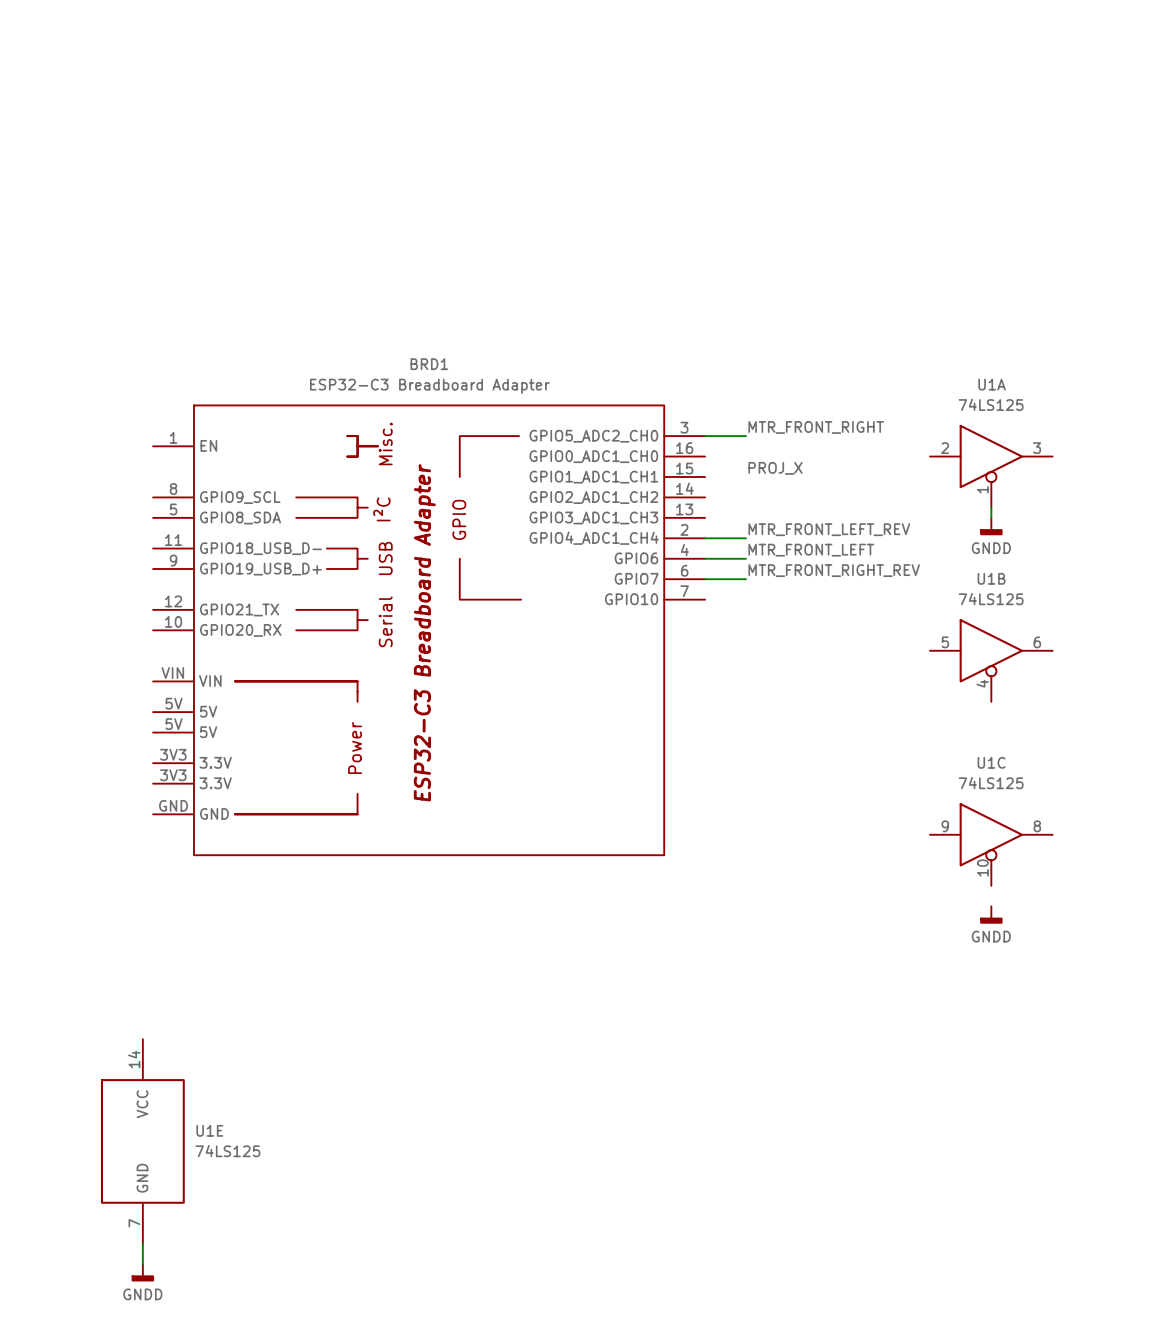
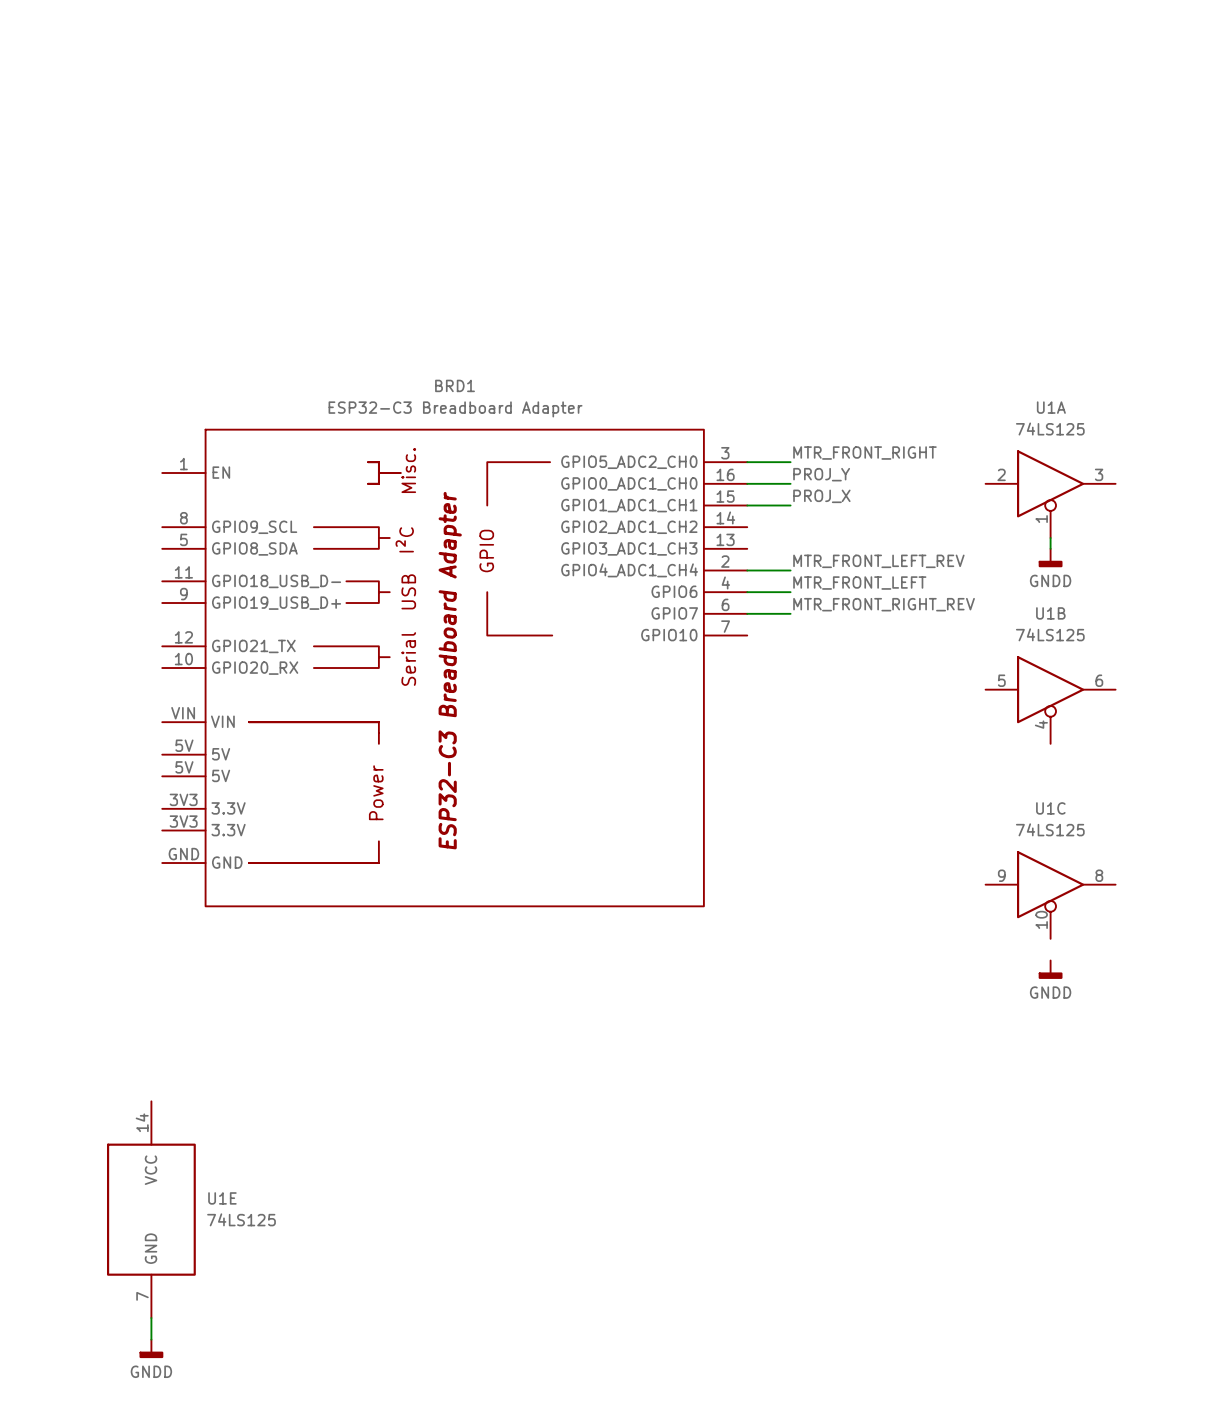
label: none -> PROJ_Y (821, 474)
wire: none -> (747, 483) (790, 483)
wire: none -> (747, 505) (790, 505)

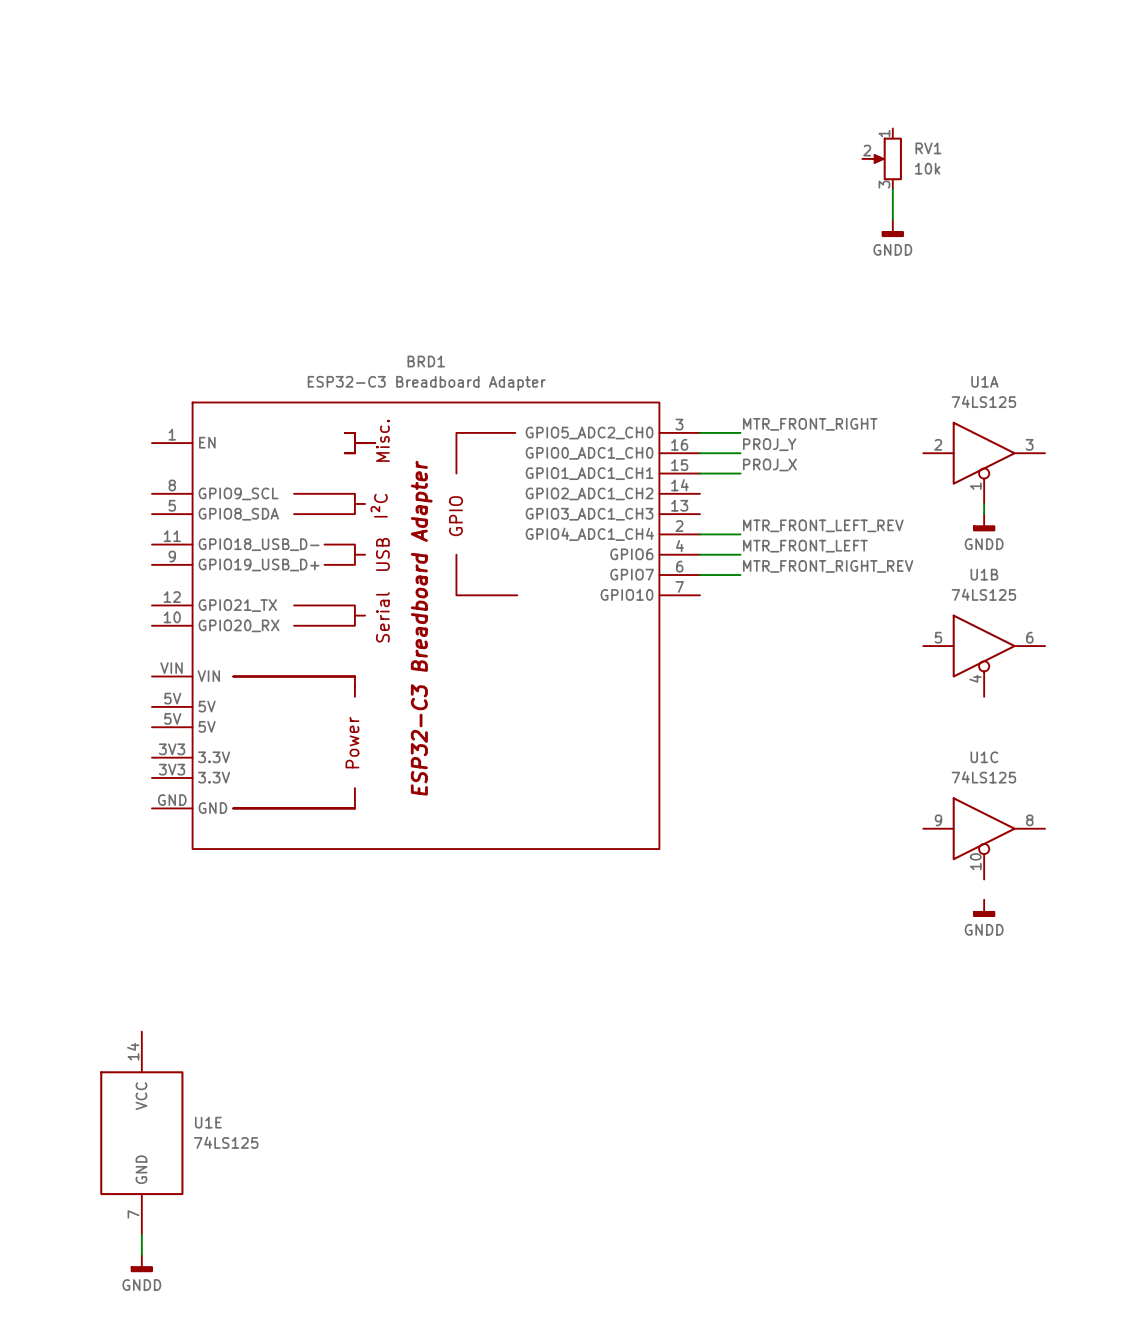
RV1: none -> 10k (882, 158)
wire: none -> (892, 189) (892, 219)
power symbol: none -> GNDD (892, 228)

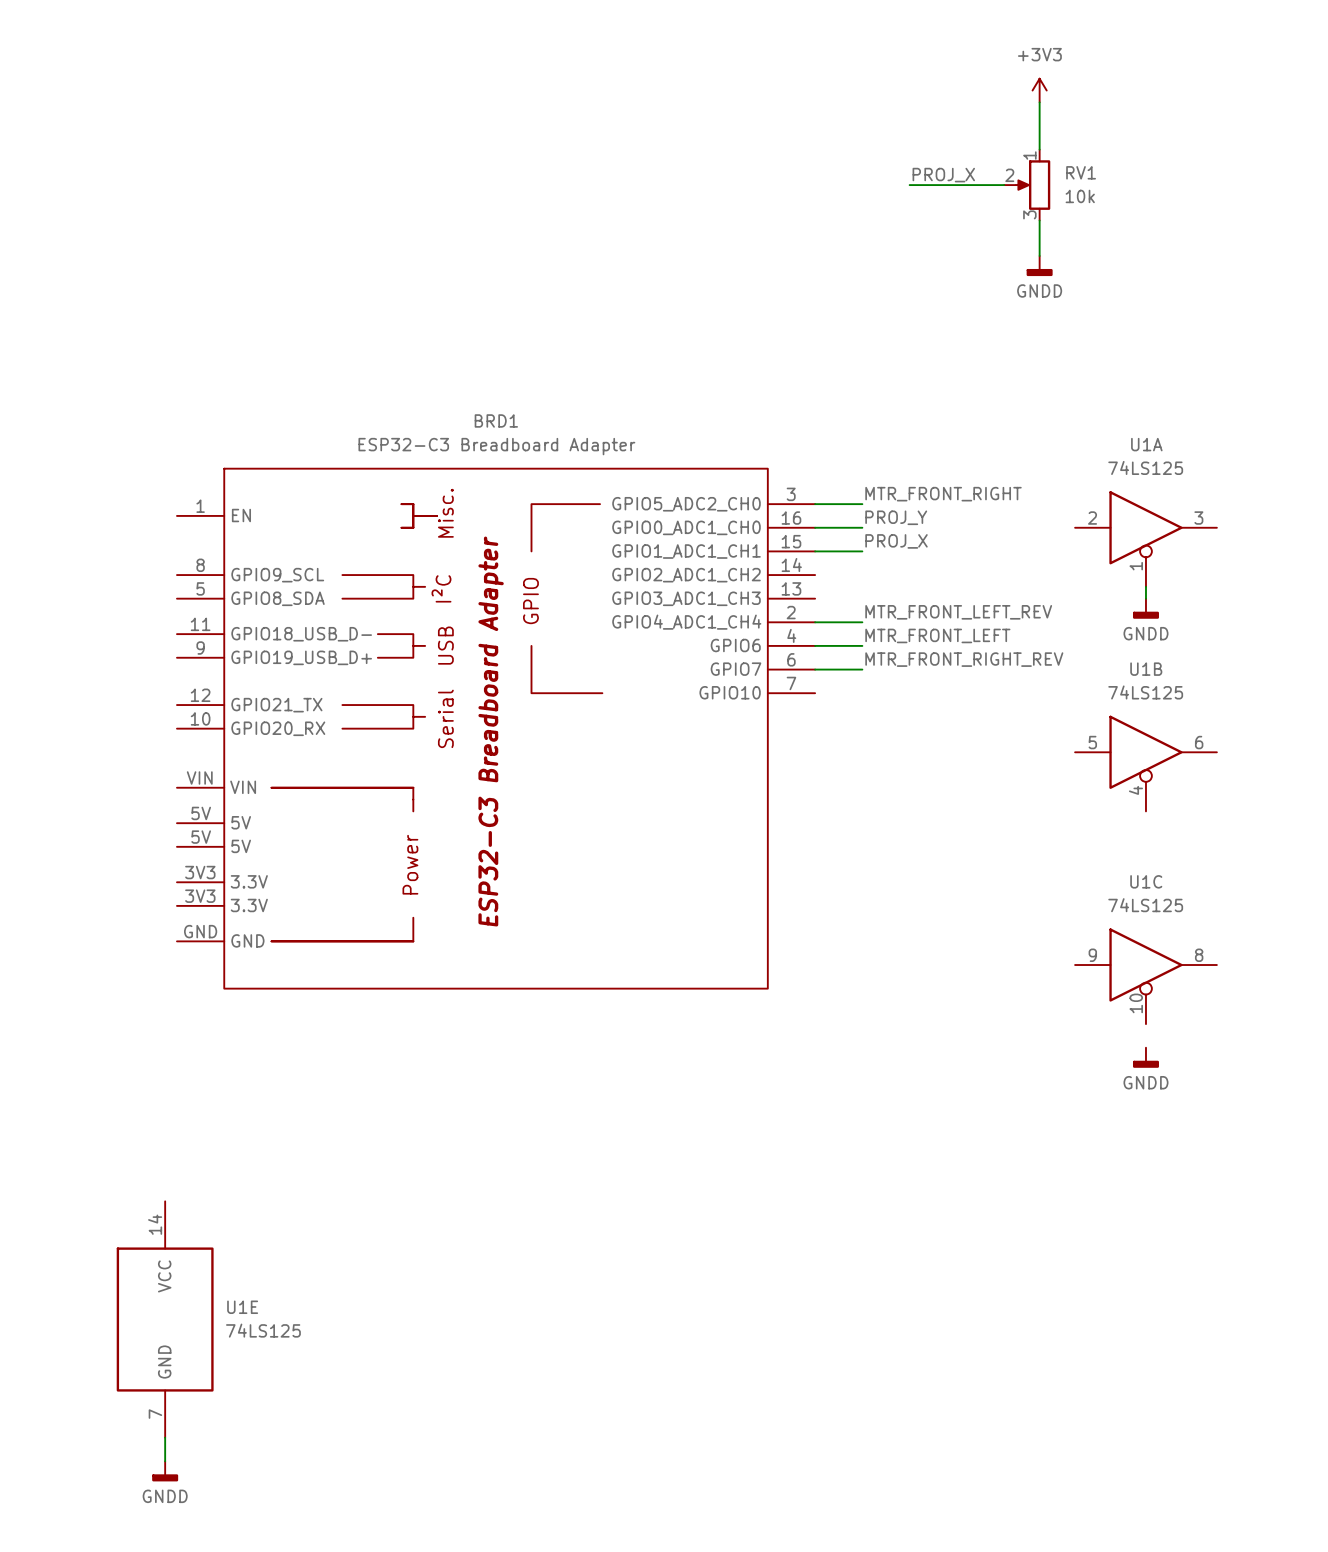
power symbol: none -> +3V3 (1039, 90)
wire: none -> (1039, 102) (1039, 149)
label: none -> PROJ_X (943, 175)
wire: none -> (909, 185) (1004, 185)

